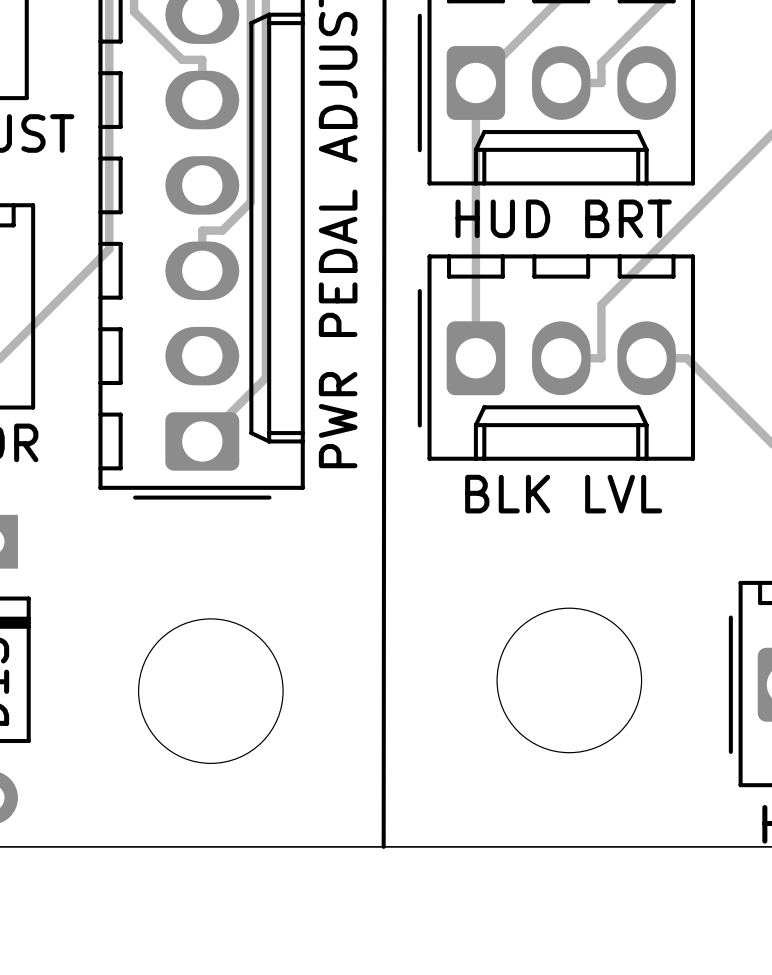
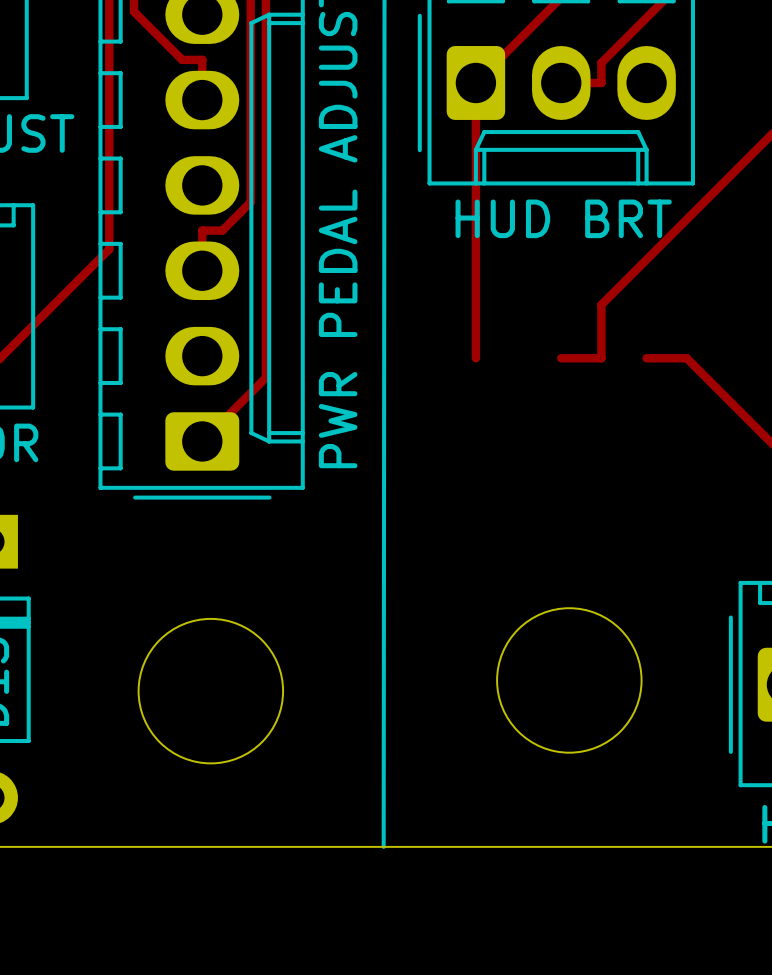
part: BLK LVL (556, 357) -> none

